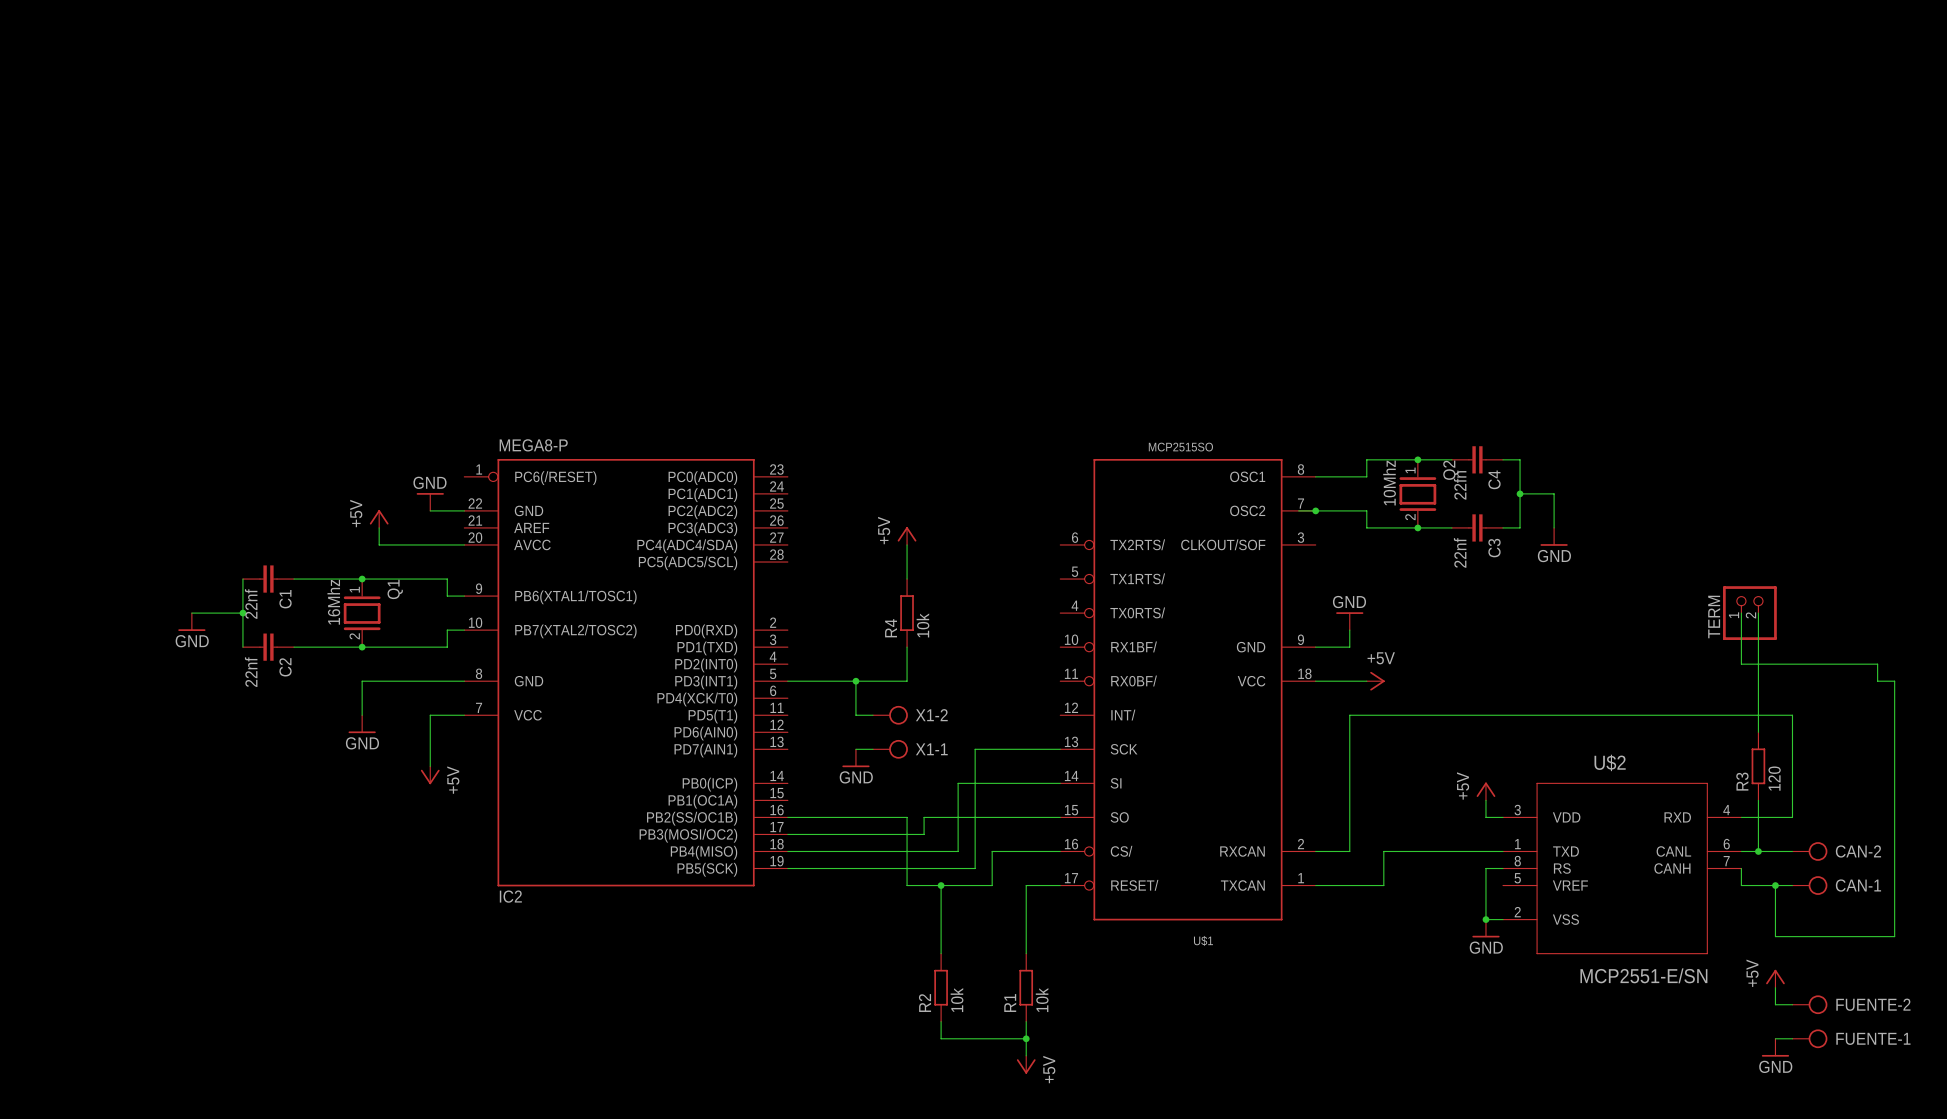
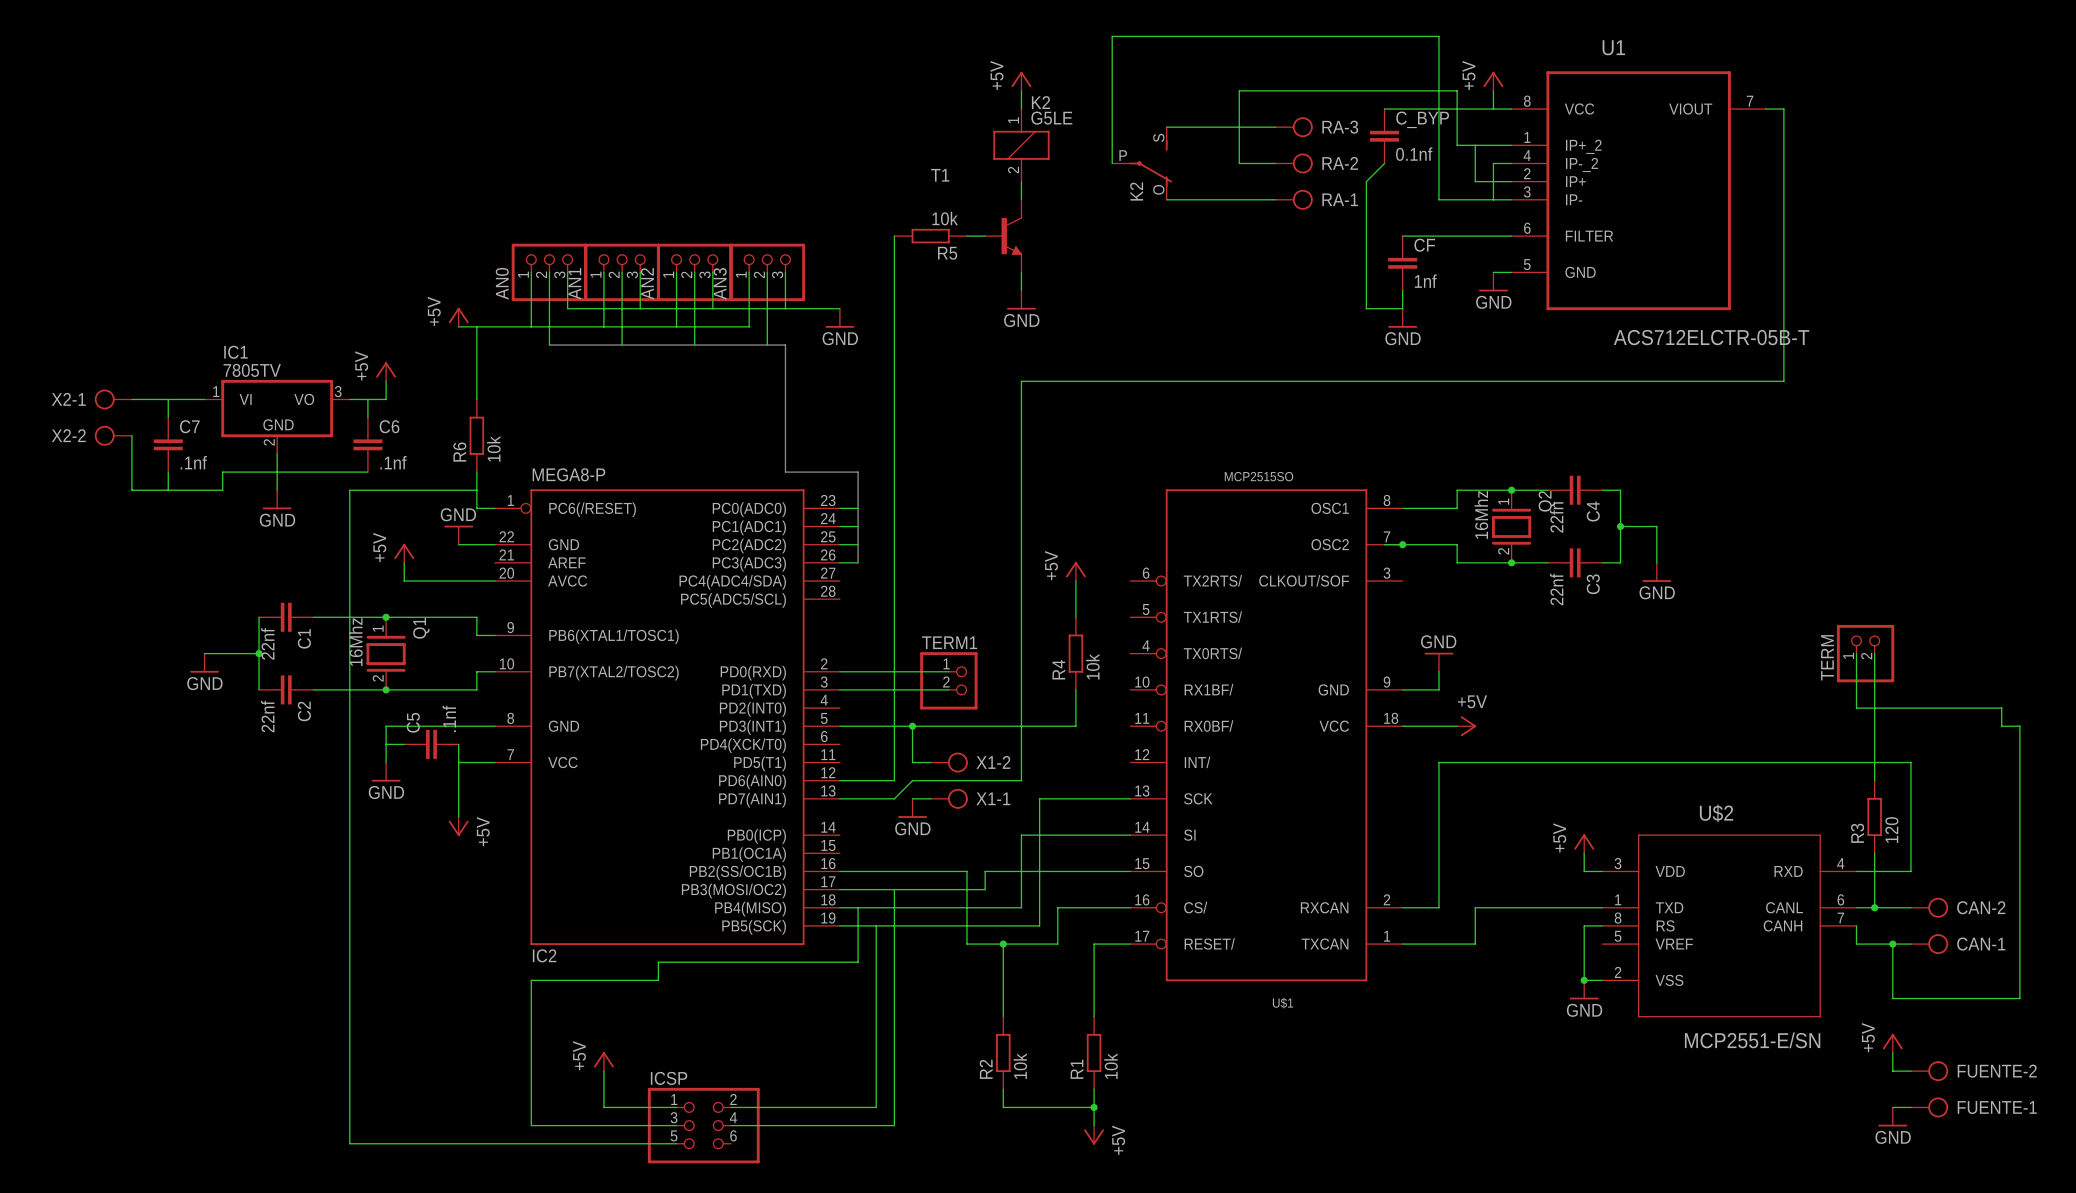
power symbol: none -> +5V (1021, 81)
power symbol: none -> +5V (1493, 81)
wire: none -> (1021, 90) (1021, 109)
wire: none -> (1493, 90) (1493, 109)
wire: none -> (1384, 109) (1511, 109)
wire: none -> (1765, 109) (1783, 109) (1783, 381) (1021, 381) (1021, 780) (912, 780) (894, 798) (839, 798)
wire: none -> (1166, 127) (1275, 127)
RA-3: none -> (1294, 127)
C_BYP: none -> 0.1nf (1384, 136)
K2: none -> G5LE (1021, 145)
wire: none -> (1475, 145) (1475, 181) (1511, 181)
wire: none -> (1511, 145) (1457, 145) (1457, 90) (1239, 90) (1239, 163) (1275, 163)
wire: none -> (1112, 163) (1112, 36) (1438, 36) (1438, 199) (1511, 199)
K2: none -> (1142, 163)
RA-2: none -> (1294, 163)
wire: none -> (1384, 163) (1366, 181) (1366, 308) (1402, 308) (1402, 290)
wire: none -> (1511, 163) (1493, 163) (1493, 199)
wire: none -> (1021, 181) (1021, 199)
U1: none -> ACS712ELCTR-05B-T (1638, 190)
wire: none -> (1166, 199) (1275, 199)
RA-1: none -> (1294, 199)
wire: none -> (894, 236) (894, 780) (839, 780)
R5: none -> 10k (930, 236)
wire: none -> (966, 236) (985, 236)
T1: none -> (1003, 236)
wire: none -> (1402, 236) (1511, 236)
CF: none -> 1nf (1402, 263)
wire: none -> (531, 272) (531, 326)
wire: none -> (549, 272) (549, 345)
AN0: none -> (549, 272)
wire: none -> (567, 272) (567, 308) (839, 308)
wire: none -> (603, 272) (603, 326)
wire: none -> (622, 272) (622, 345)
AN1: none -> (622, 272)
wire: none -> (640, 272) (640, 308)
wire: none -> (676, 272) (676, 326)
wire: none -> (694, 272) (694, 345)
AN2: none -> (694, 272)
wire: none -> (712, 272) (712, 308)
wire: none -> (749, 272) (749, 326) (458, 326)
wire: none -> (767, 272) (767, 345)
AN3: none -> (767, 272)
wire: none -> (785, 272) (785, 308)
wire: none -> (1021, 272) (1021, 290)
wire: none -> (1493, 272) (1511, 272)
power symbol: none -> GND (1493, 281)
power symbol: none -> GND (1021, 300)
power symbol: none -> +5V (458, 317)
power symbol: none -> GND (839, 318)
power symbol: none -> GND (1402, 318)
wire: none -> (476, 326) (476, 399)
bus: none -> (549, 345) (785, 345) (785, 472) (858, 472) (858, 562)
power symbol: none -> +5V (386, 371)
wire: none -> (386, 381) (386, 399) (349, 399)
X2-1: none -> (113, 399)
wire: none -> (131, 399) (204, 399)
wire: none -> (168, 399) (168, 417)
wire: none -> (367, 399) (367, 417)
IC1: none -> 7805TV (277, 416)
X2-2: none -> (113, 435)
wire: none -> (131, 435) (131, 490) (222, 490) (222, 472) (367, 472)
R6: none -> 10k (476, 435)
C7: none -> .1nf (168, 444)
C6: none -> .1nf (367, 444)
wire: none -> (277, 453) (277, 490)
wire: none -> (168, 472) (168, 490)
wire: none -> (476, 472) (476, 508) (495, 508)
wire: none -> (476, 490) (349, 490) (349, 1143) (676, 1143)
power symbol: none -> GND (277, 499)
wire: none -> (839, 508) (858, 508)
Q2 value: 10Mhz (1389, 483) -> 16Mhz (1481, 514)
wire: none -> (839, 526) (858, 526)
wire: none -> (839, 544) (858, 544)
wire: none -> (839, 562) (858, 562)
power symbol position: +5V (907, 536) -> +5V (1075, 571)
wire: (907, 544) (907, 579) -> (1075, 581) (1075, 617)
R4 position: (907, 613) -> (1075, 653)
wire: none -> (839, 671) (948, 671)
TERM1: none -> (948, 680)
wire: none -> (839, 689) (948, 689)
wire: (907, 647) (907, 681) -> (1075, 689) (1075, 726) (966, 726)
wire: none -> (386, 744) (404, 744)
C5: none -> .1nf (431, 744)
wire: none -> (458, 744) (458, 762)
wire: none -> (894, 889) (894, 1125) (731, 1125)
wire: none -> (858, 907) (858, 962) (658, 962) (658, 980) (531, 980) (531, 1125) (676, 1125)
wire: none -> (876, 925) (876, 1107) (731, 1107)
power symbol: none -> +5V (603, 1061)
wire: none -> (603, 1071) (603, 1107) (676, 1107)
ICSP: none -> (703, 1125)

